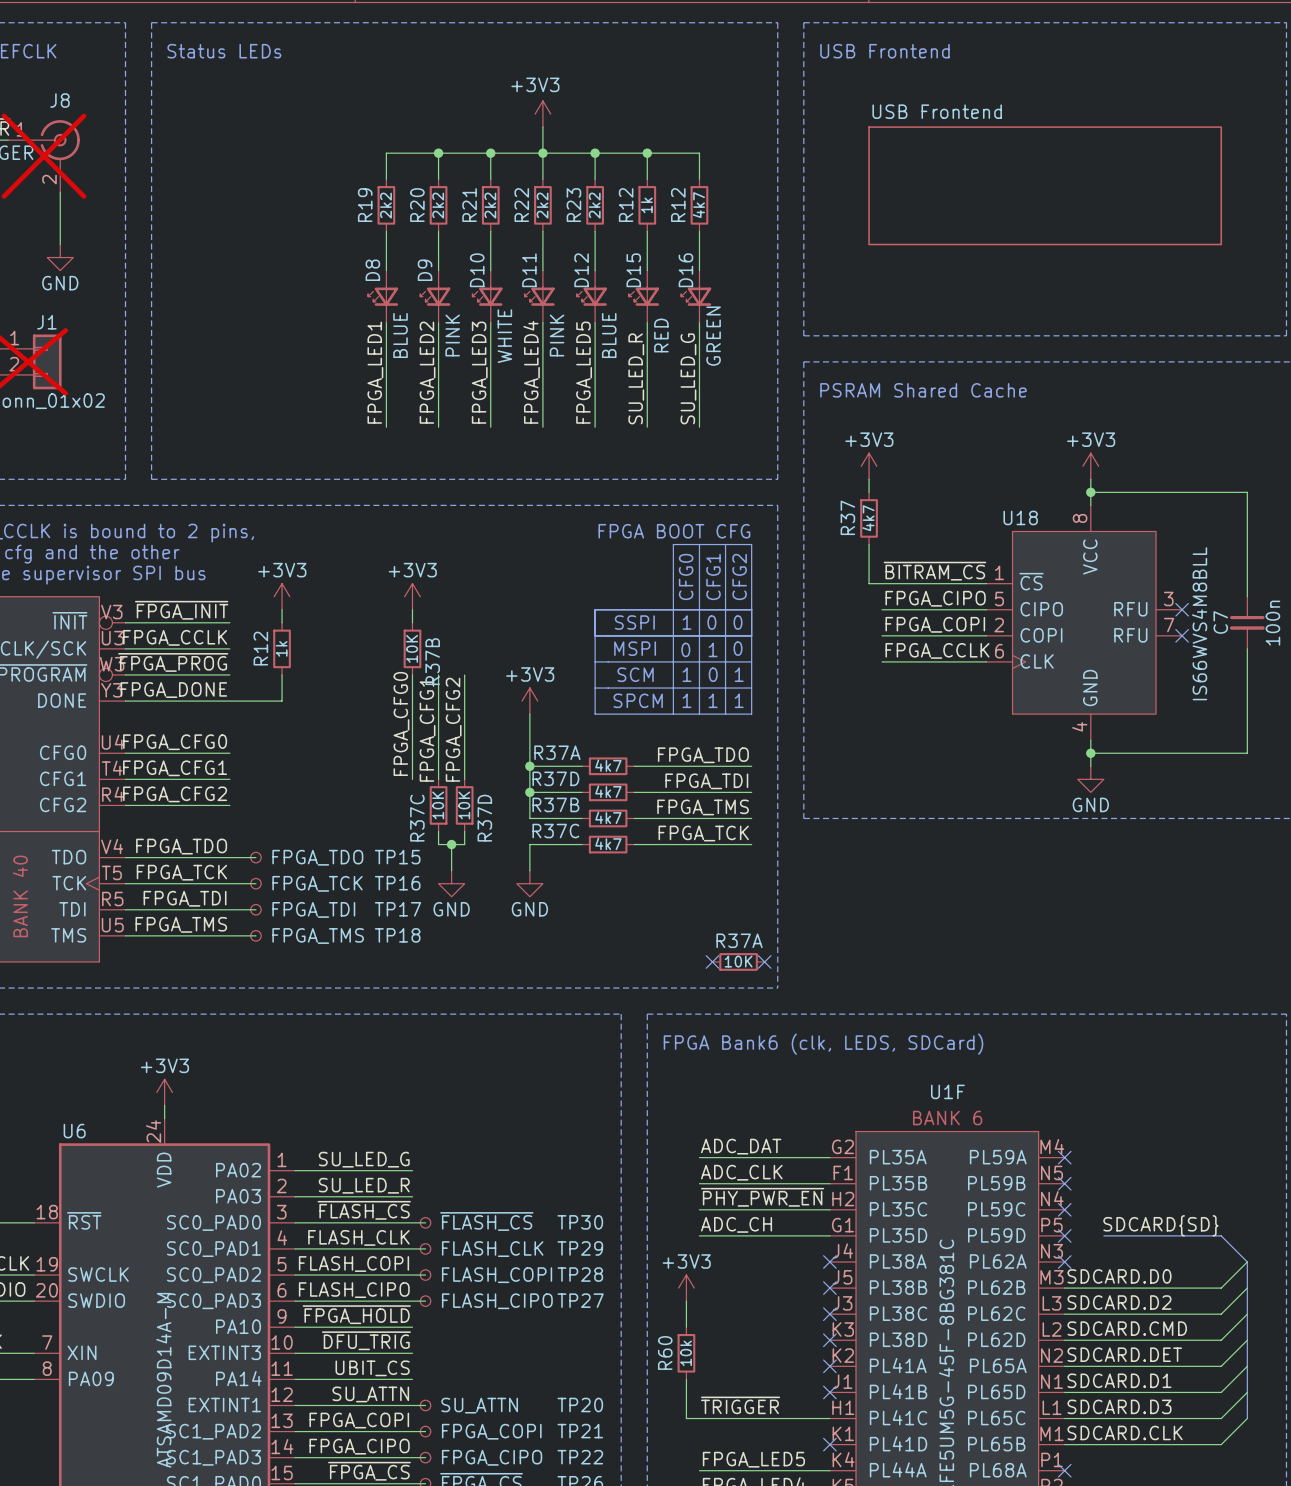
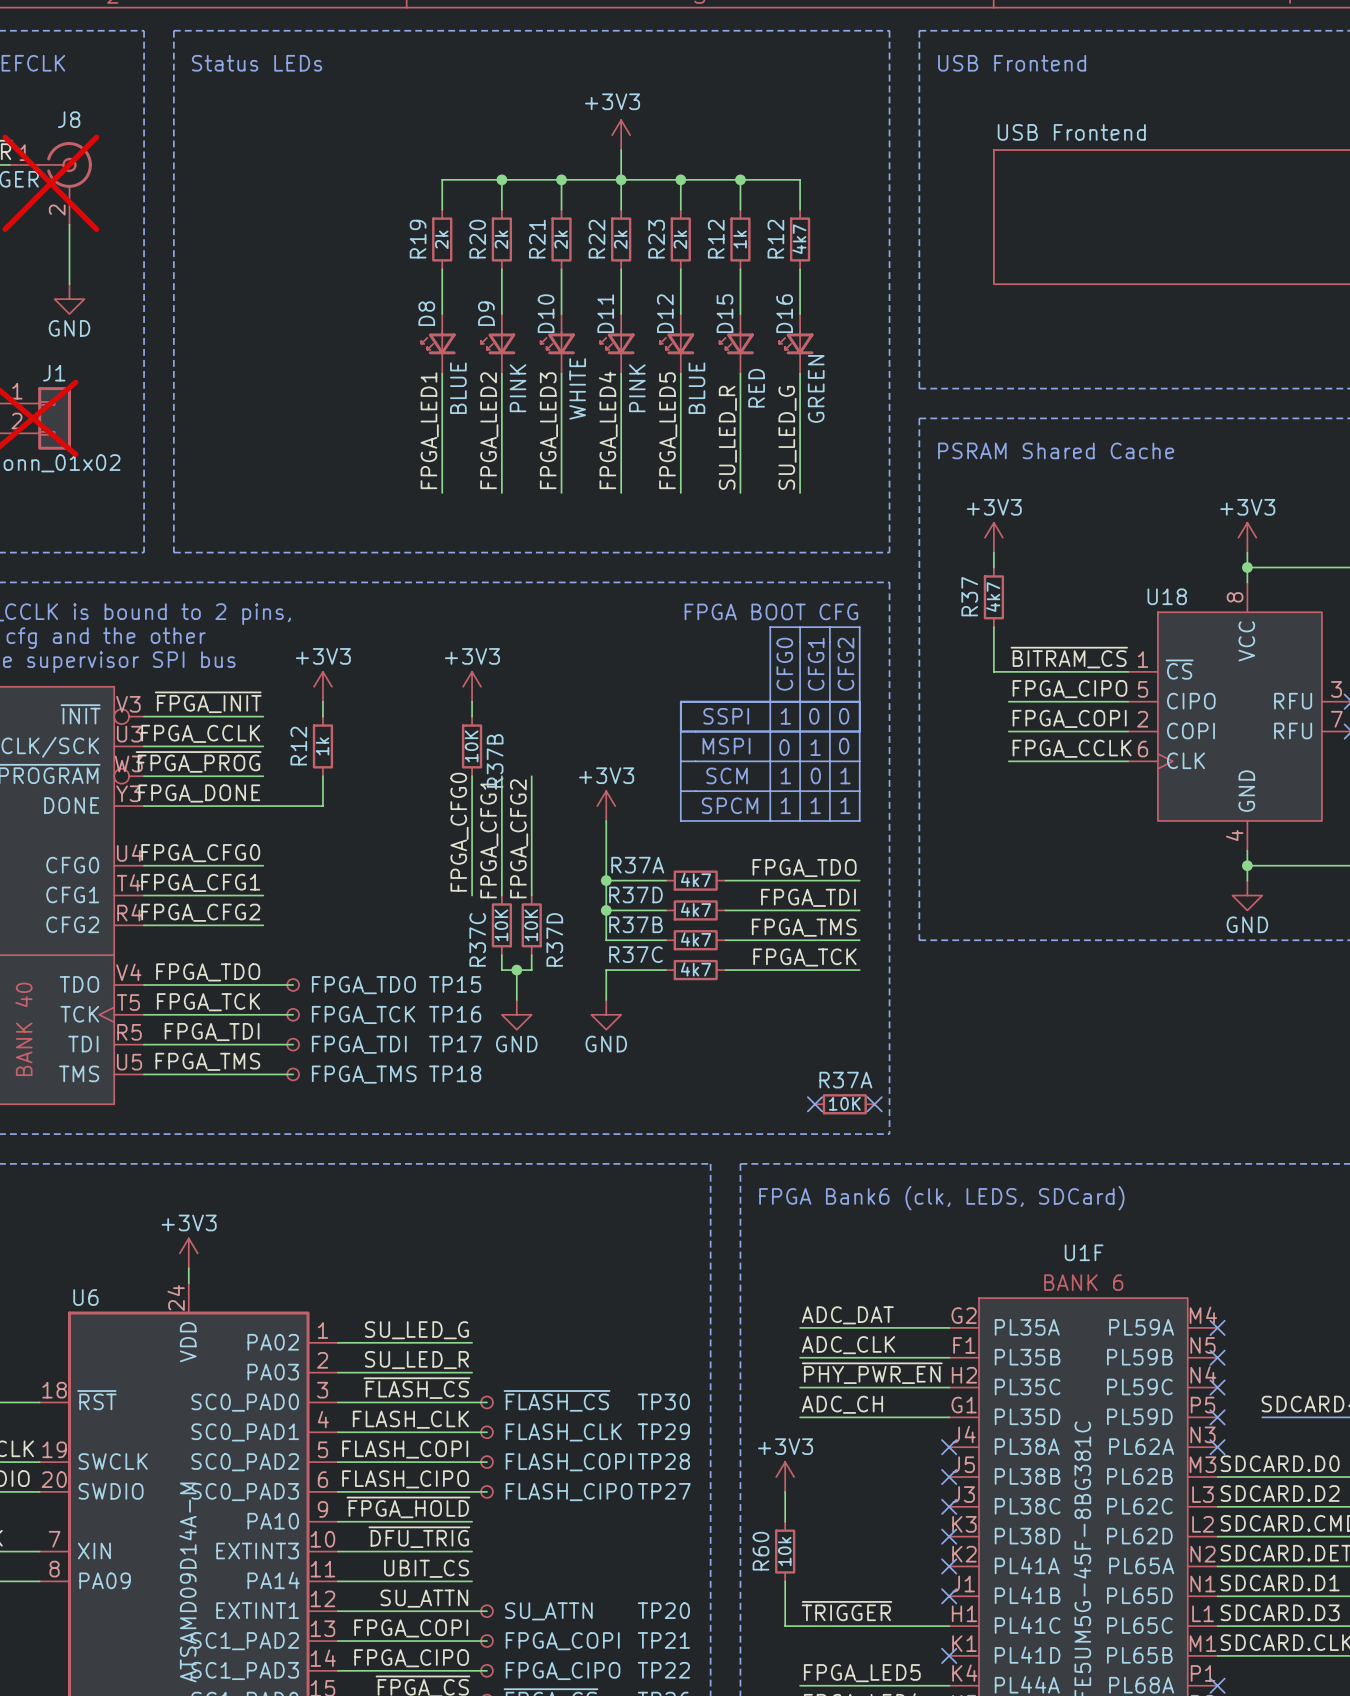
R19 value: 2k2 (386, 205) -> 2k (441, 239)
R20 value: 2k2 (438, 205) -> 2k (501, 239)
R21 value: 2k2 (490, 205) -> 2k (561, 239)
R22 value: 2k2 (542, 205) -> 2k (620, 239)
R23 value: 2k2 (594, 205) -> 2k (680, 239)

